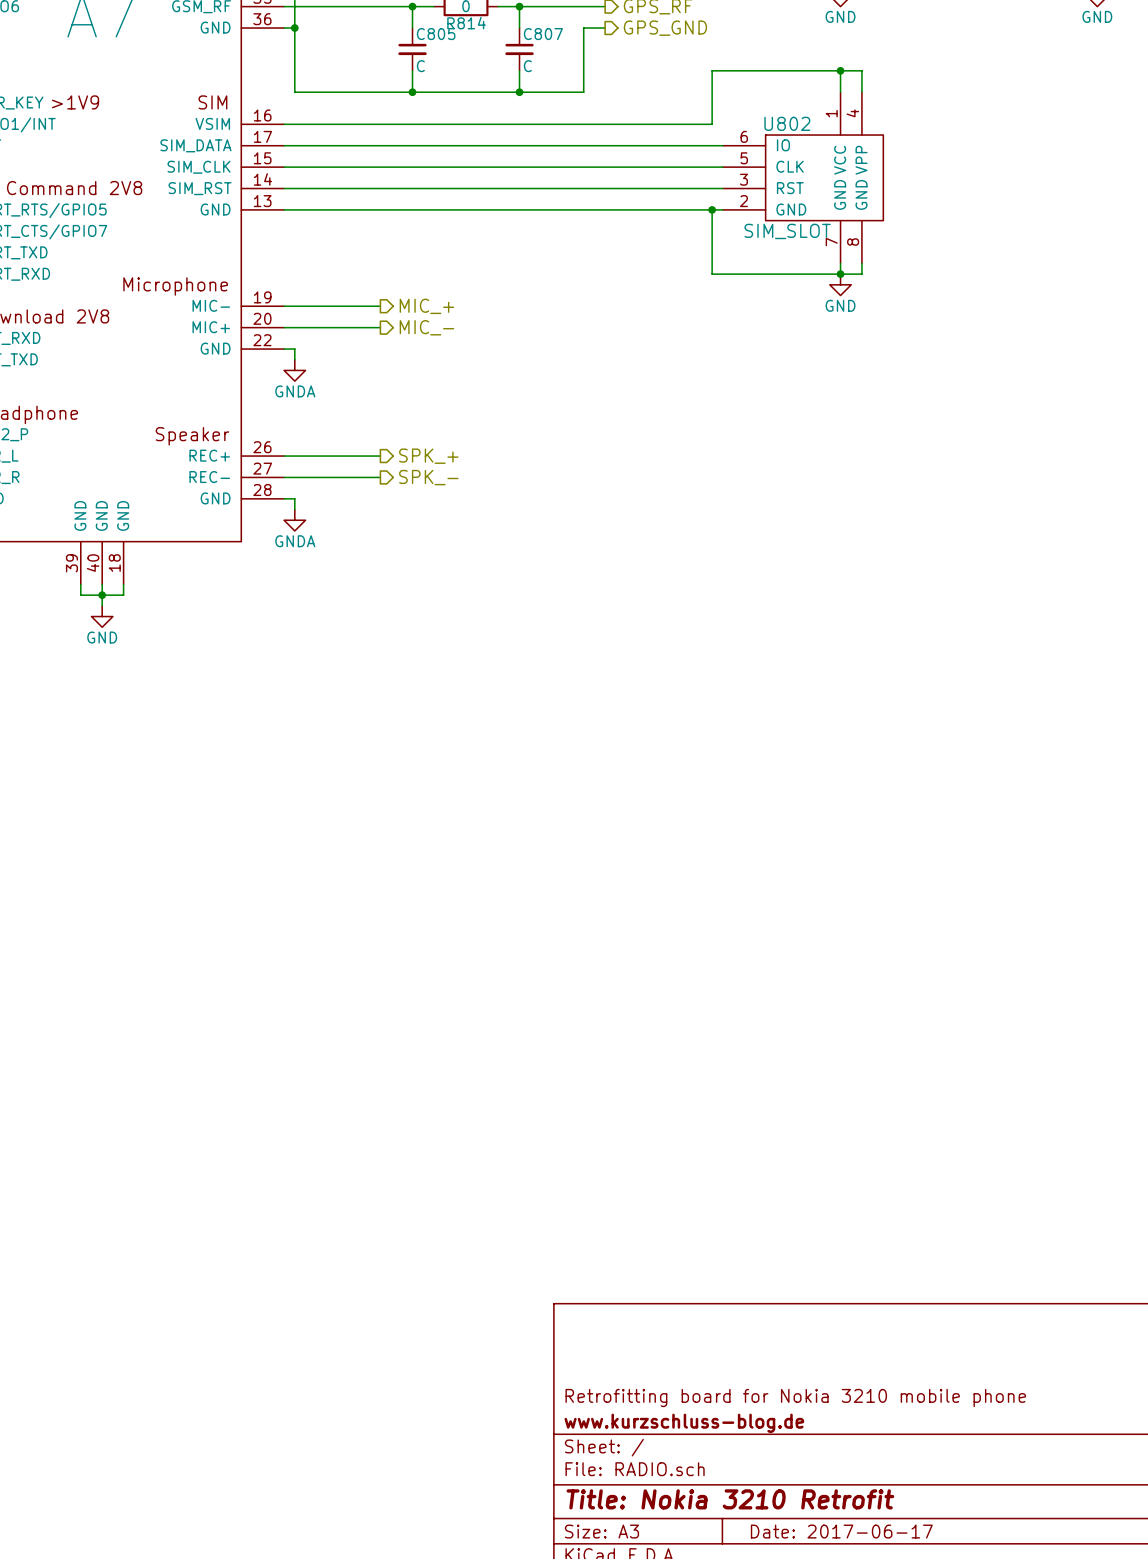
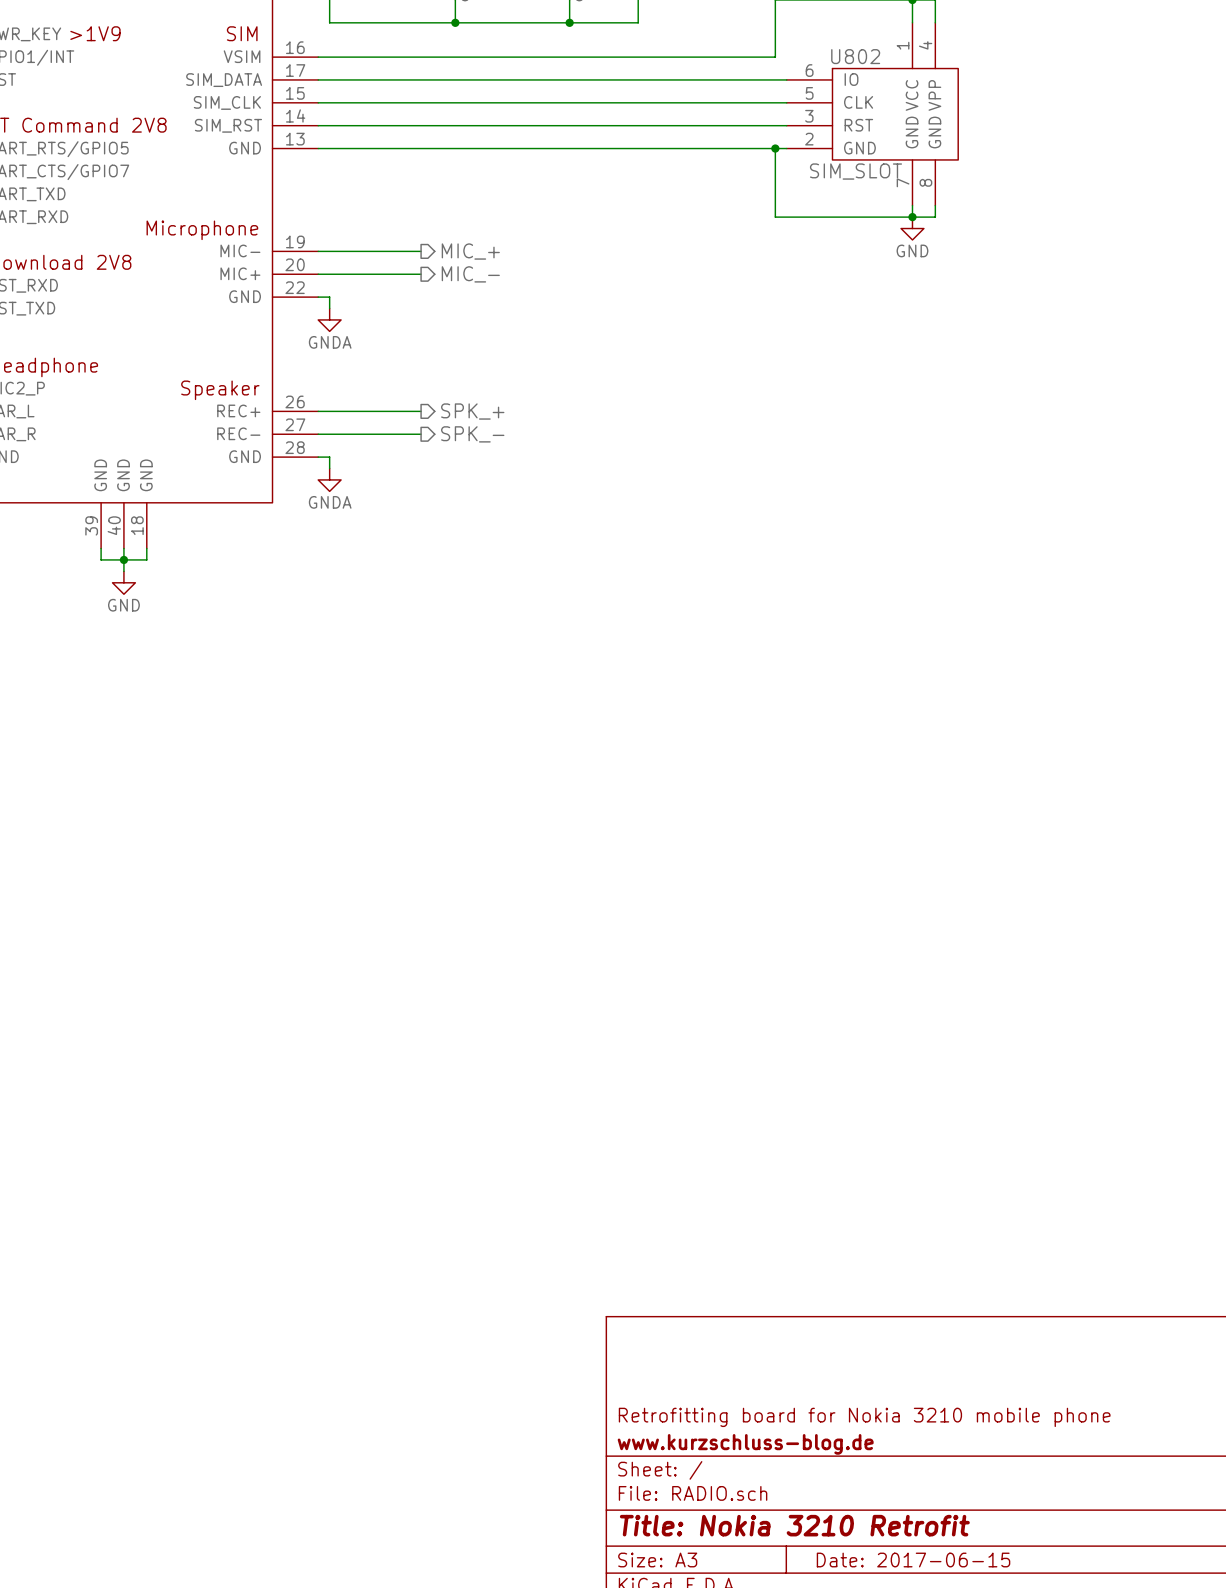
title block: Date: 2017-06-17 (841, 1531) -> Date: 2017-06-15 (913, 1560)

